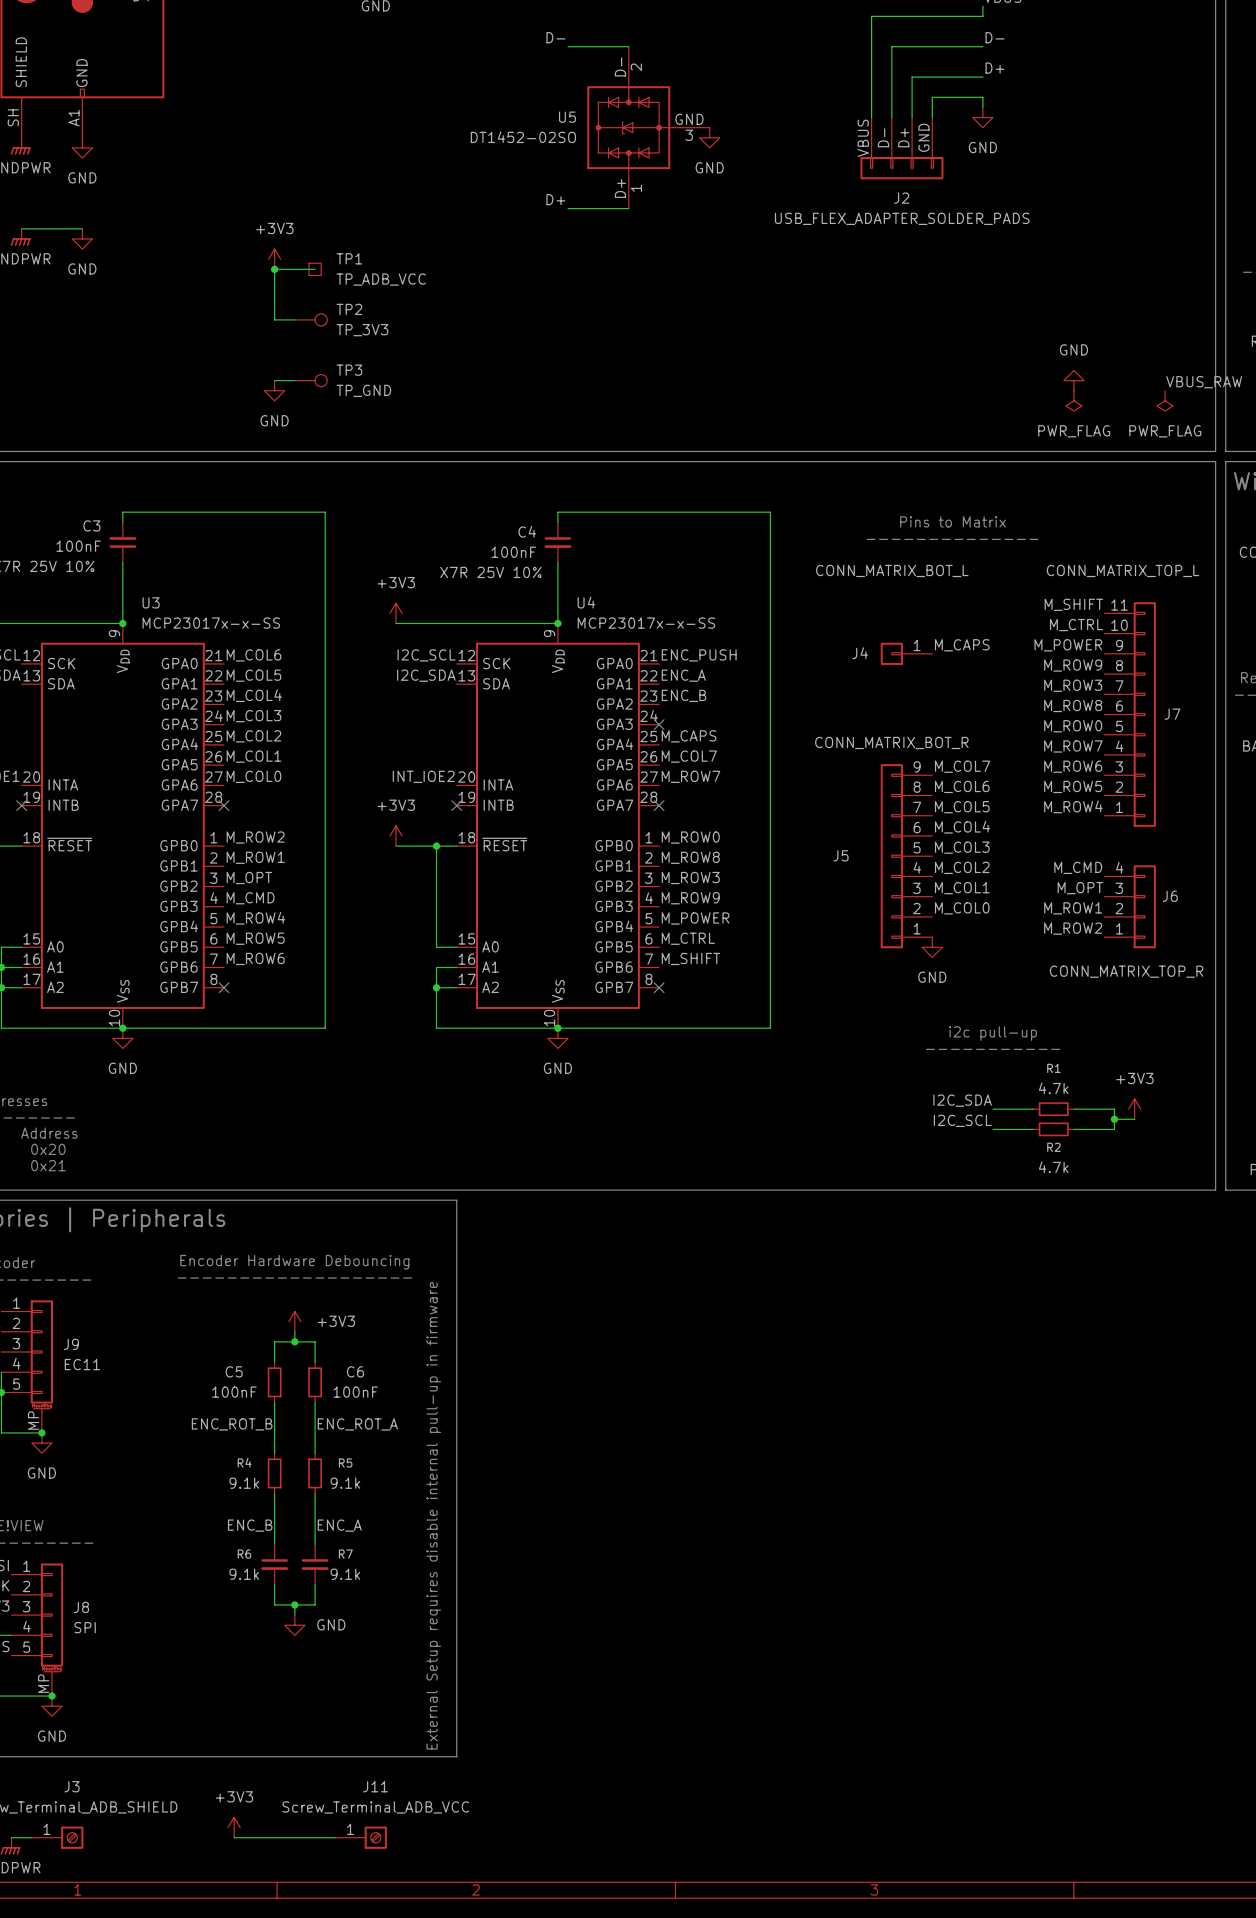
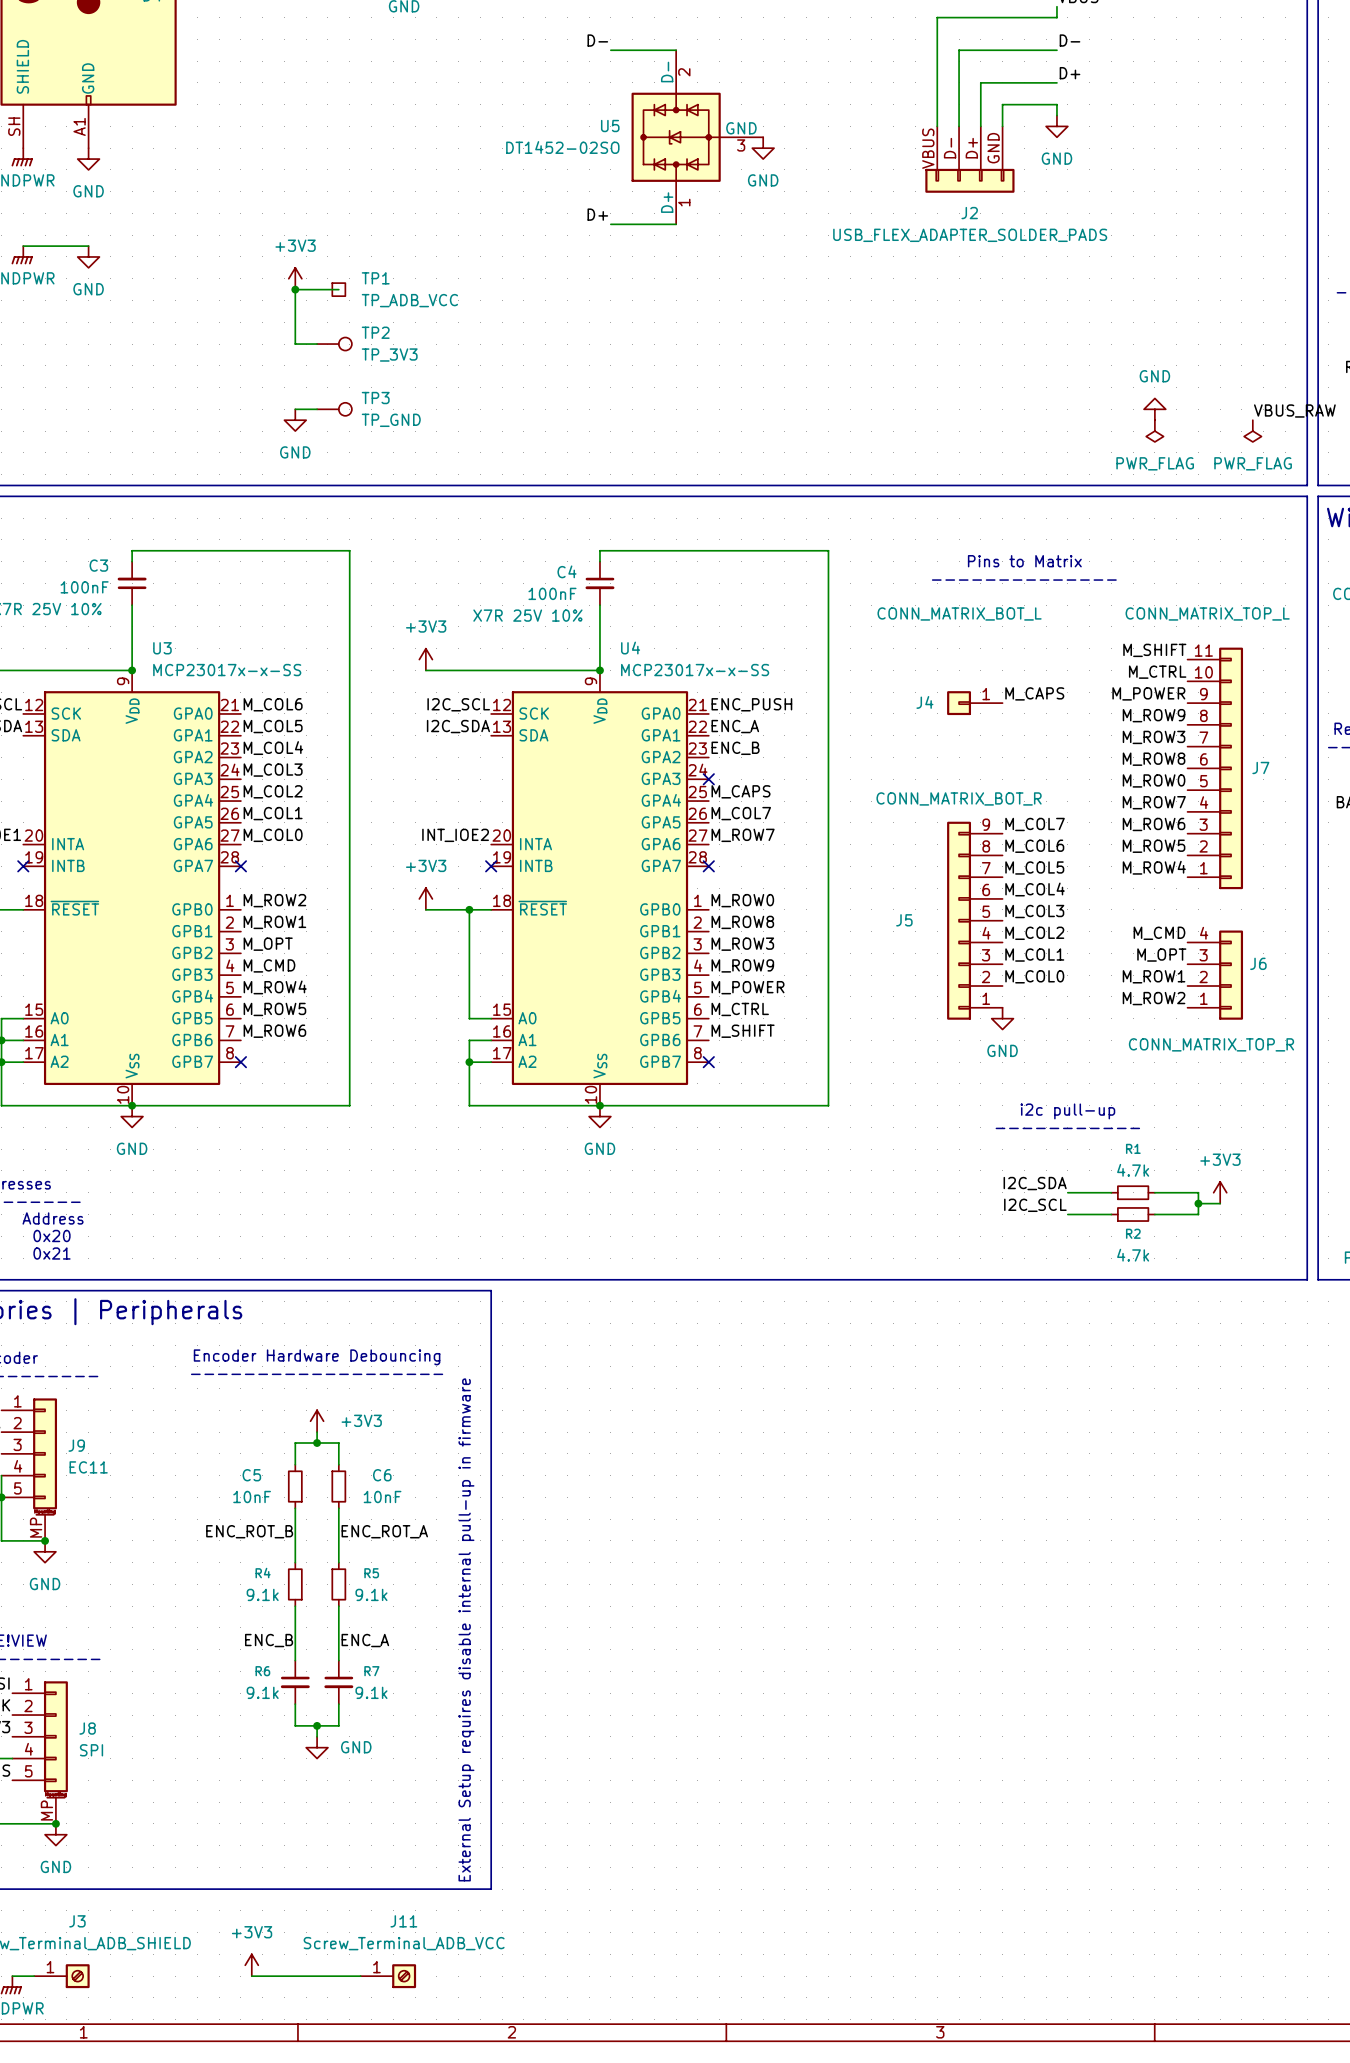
C5 value: 100nF (234, 1392) -> 10nF (252, 1496)
C6 value: 100nF (355, 1392) -> 10nF (382, 1496)

